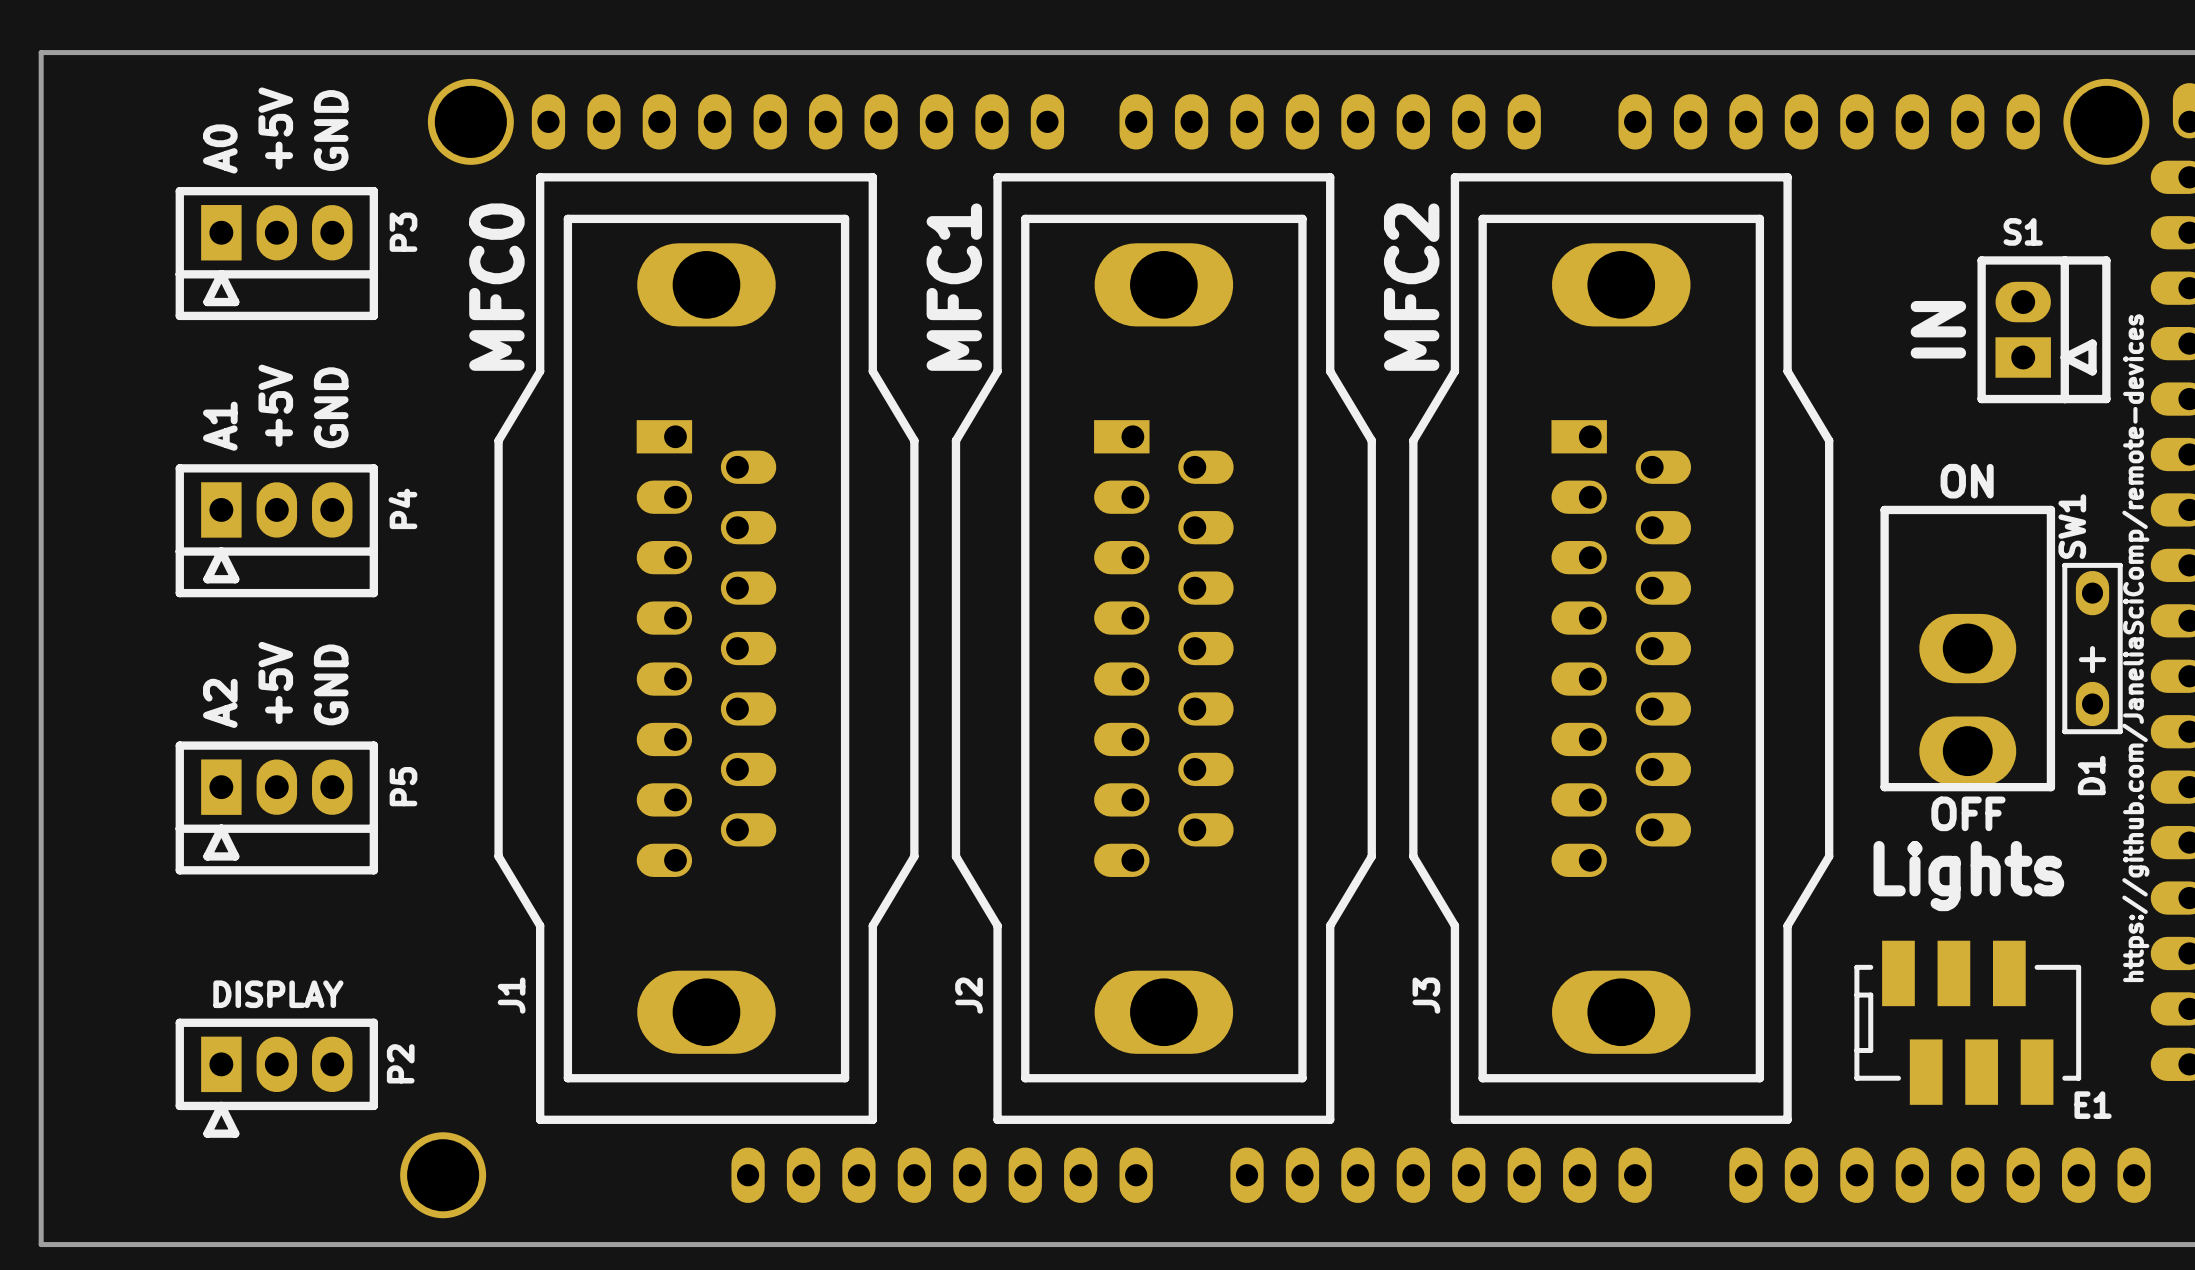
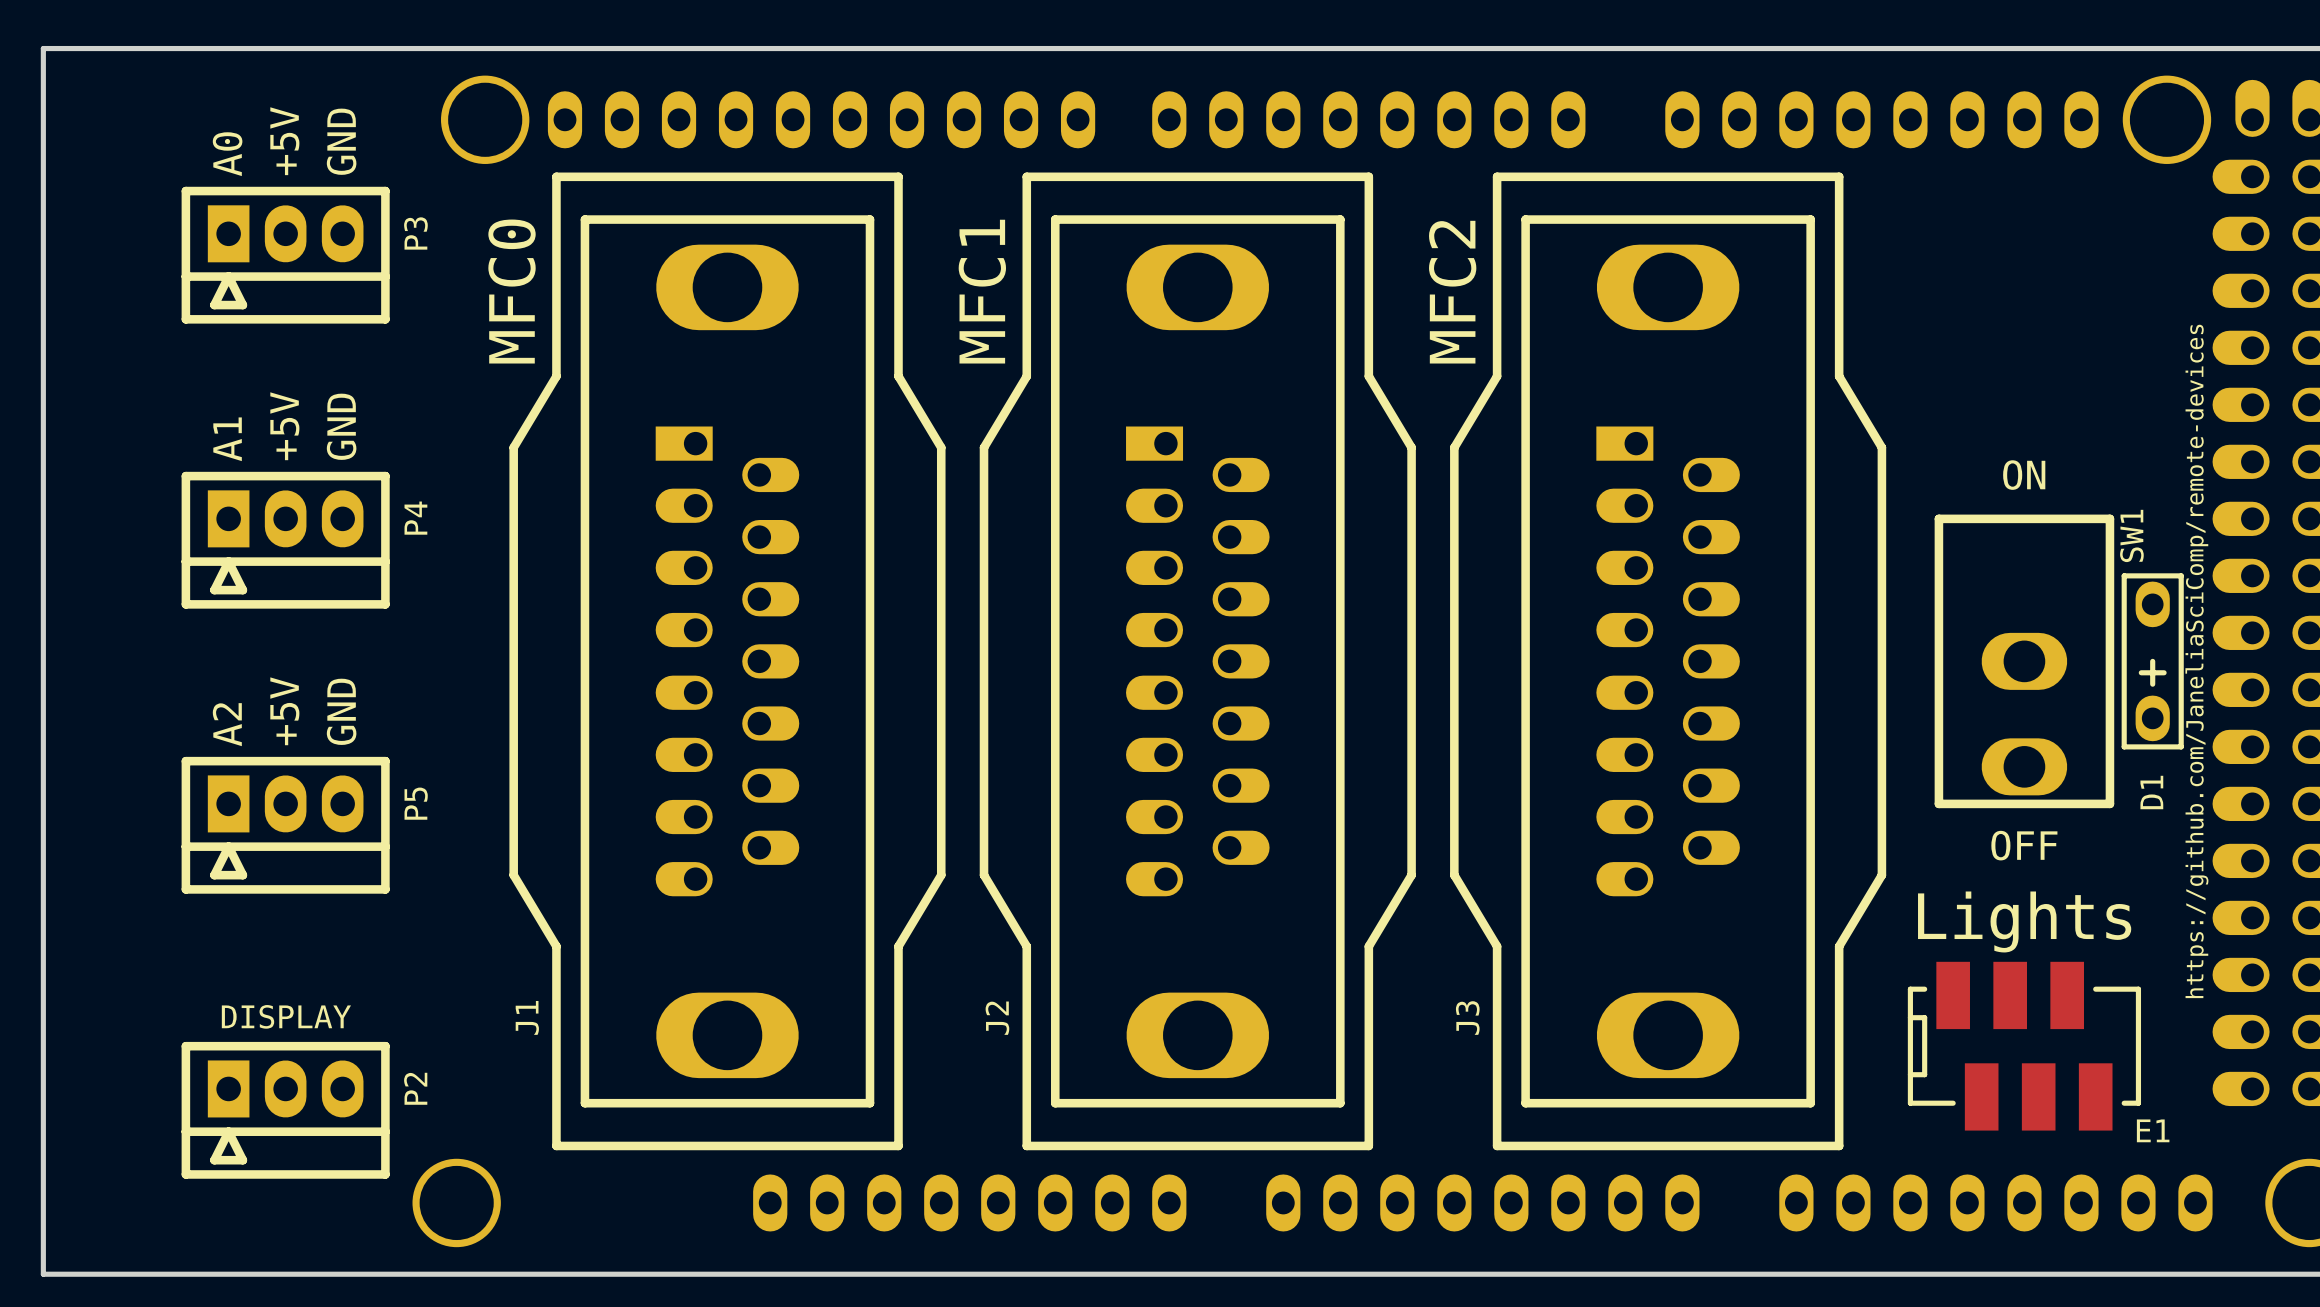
text: IN (1938, 329) -> none
S1: (2044, 329) -> none
SW1 footprint: [1880, 505, 2056, 792] -> [1934, 514, 2115, 809]
P2 footprint: [175, 1018, 378, 1138] -> [181, 1041, 390, 1179]

